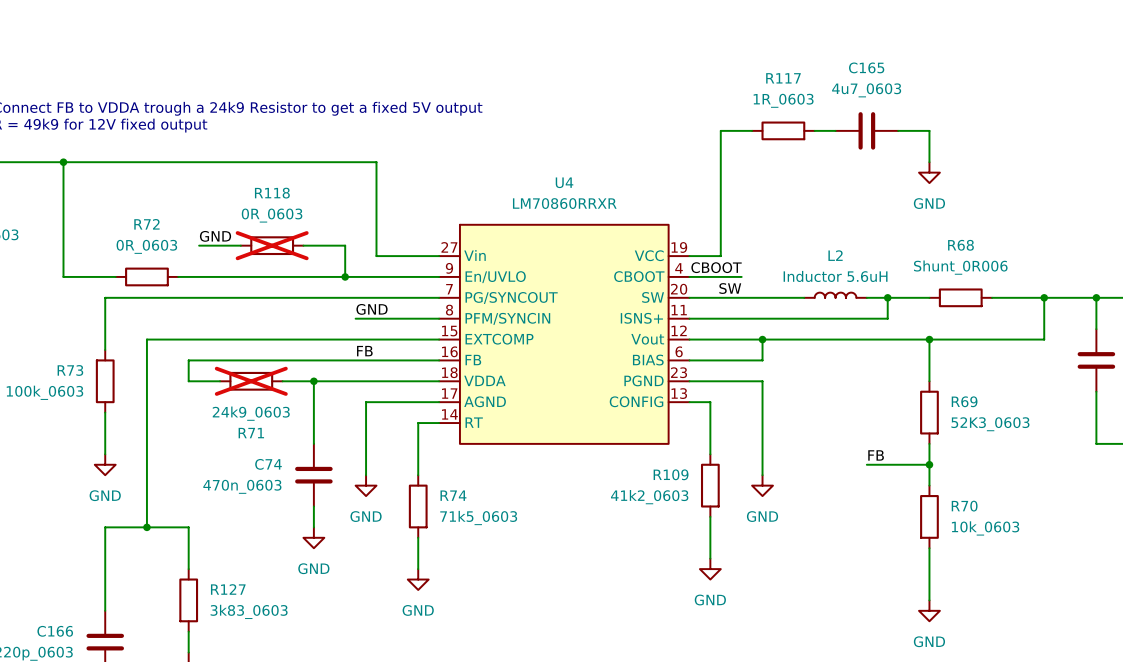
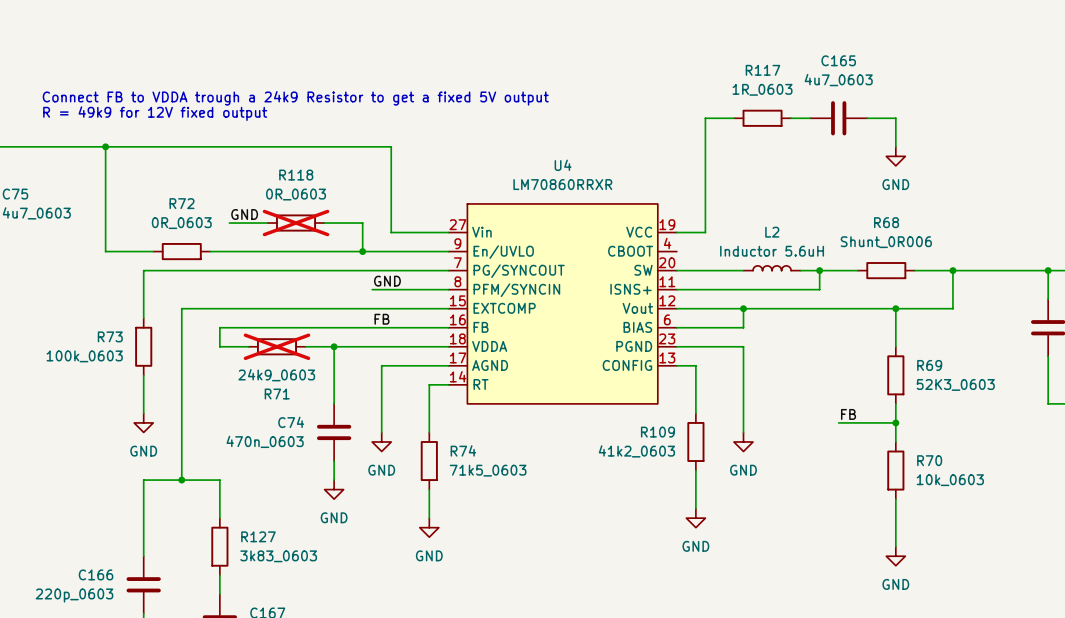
label: CBOOT (716, 267) -> none
wire: (689, 276) (741, 276) -> none
label: SW (730, 288) -> none
L2 position: (835, 295) -> (772, 268)
wire: (762, 297) (804, 297) -> (800, 270) (838, 270)
junction position: (887, 297) -> (819, 270)
wire: (929, 297) (887, 297) (887, 318) (845, 318) -> (819, 270) (819, 289)
R68 position: (960, 297) -> (886, 270)
junction: none -> (952, 270)
wire: (1044, 297) (1044, 339) (992, 339) -> (914, 270) (952, 270) (952, 308)
junction: (1044, 297) -> none

